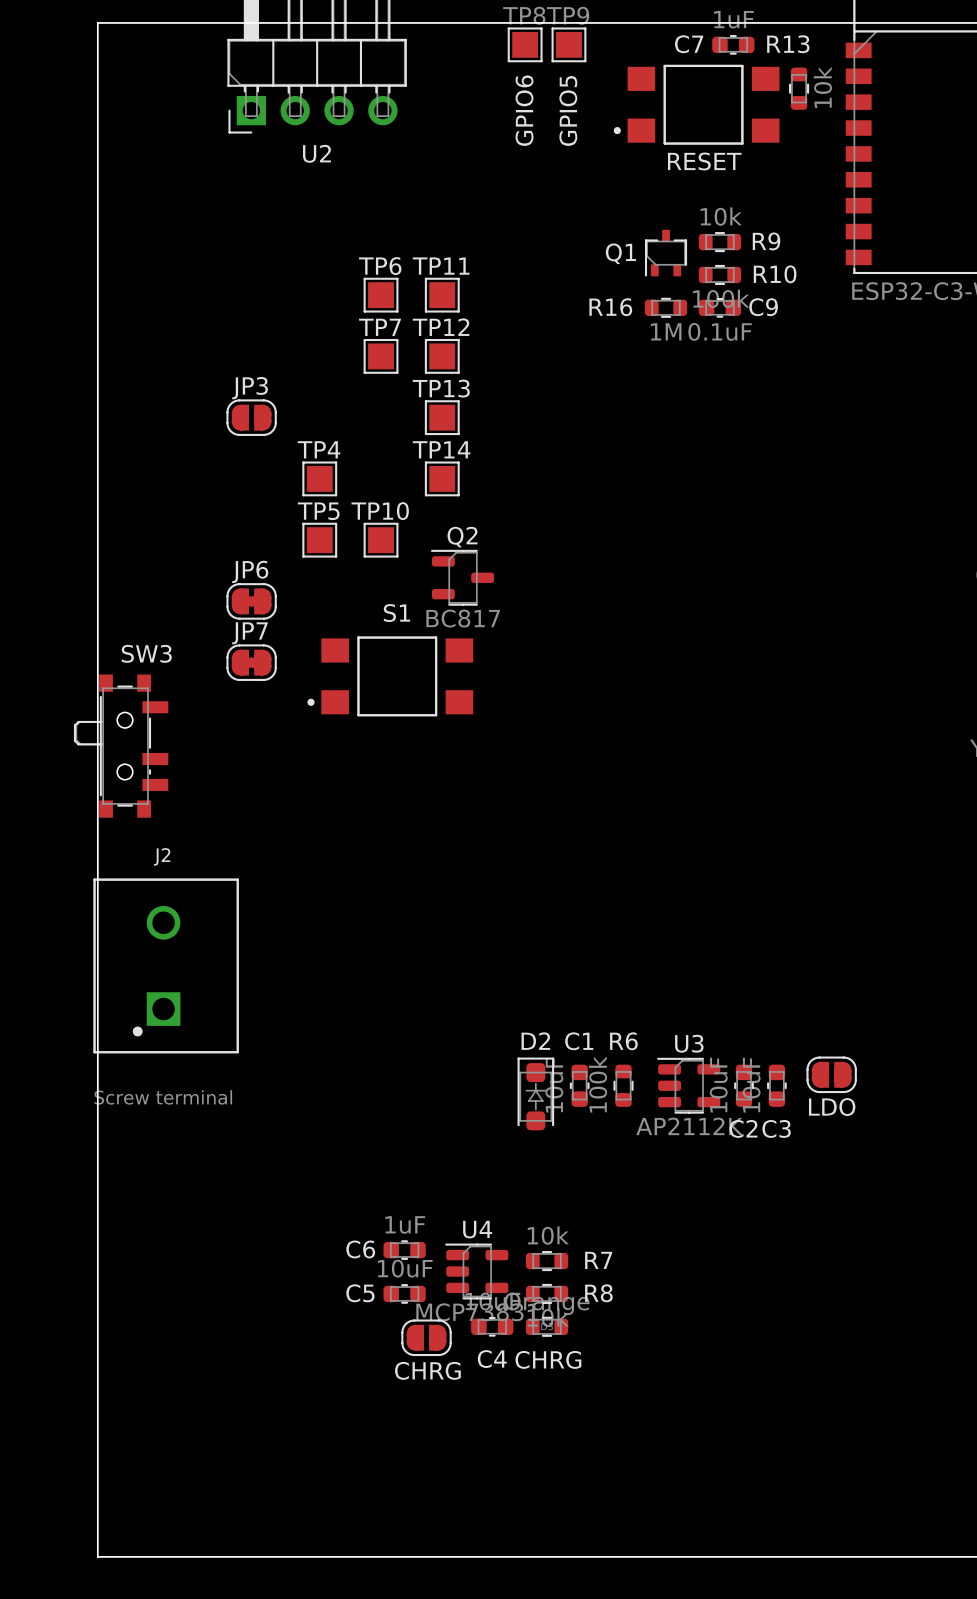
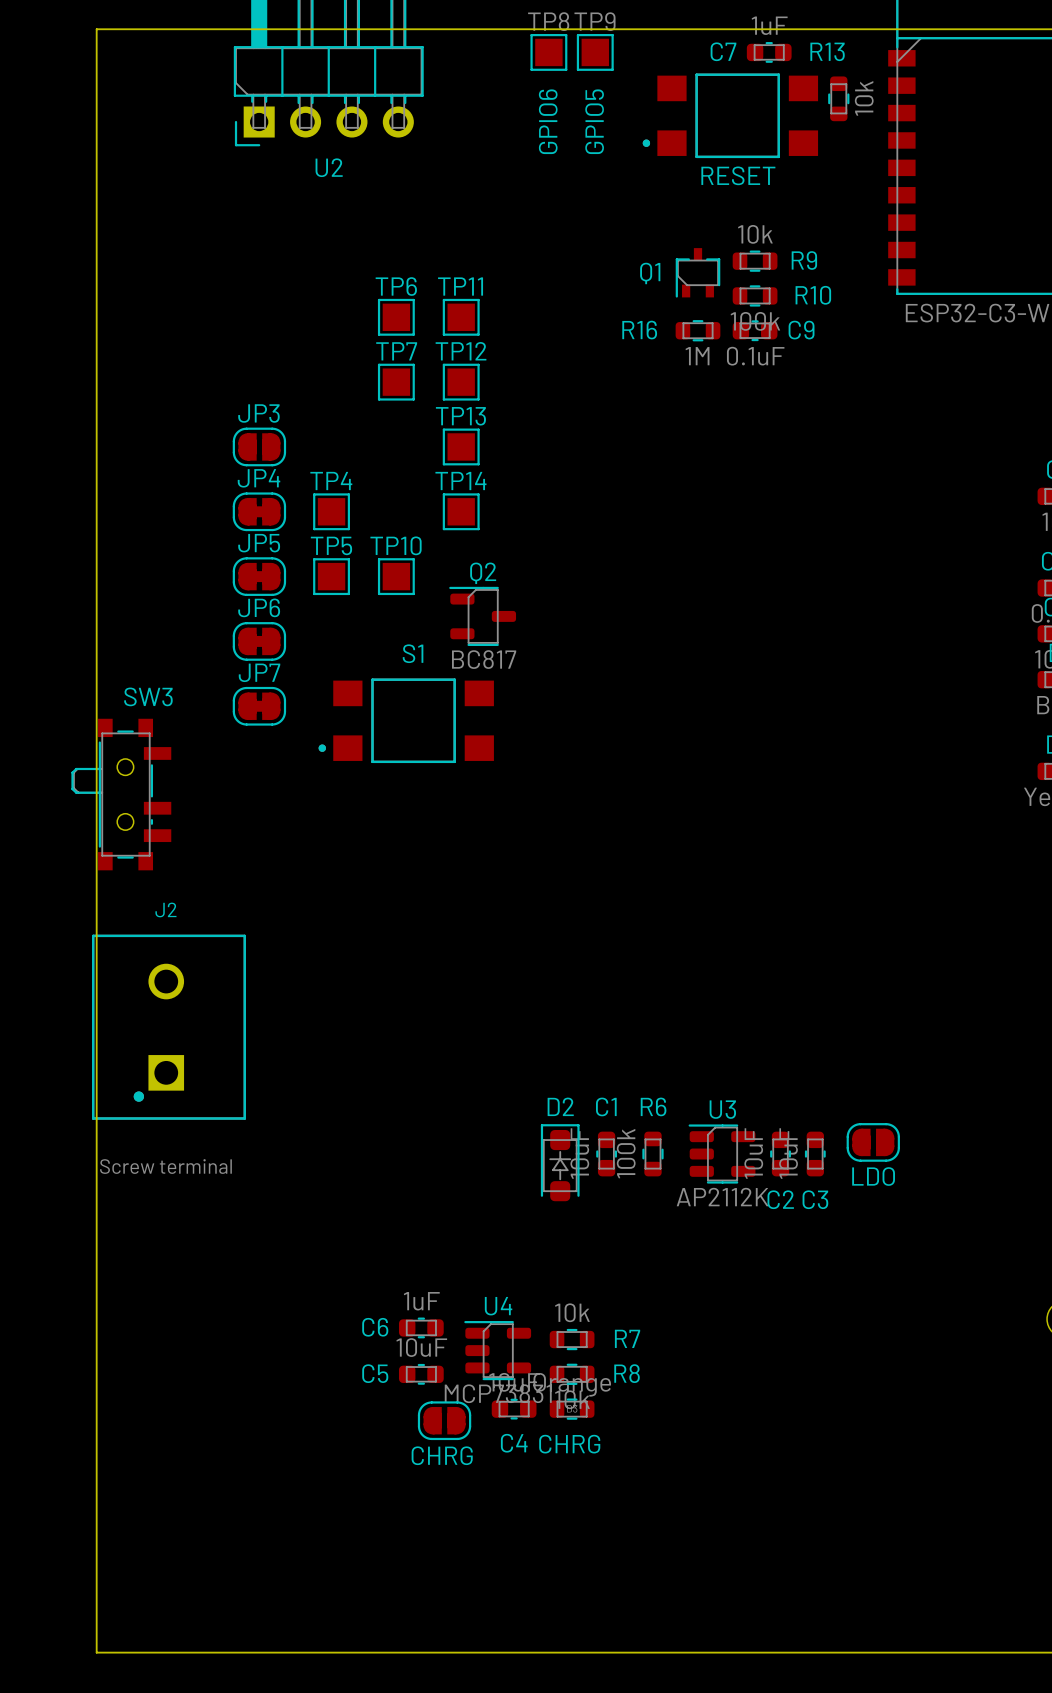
JP4: none -> (259, 511)
JP5: none -> (259, 576)

